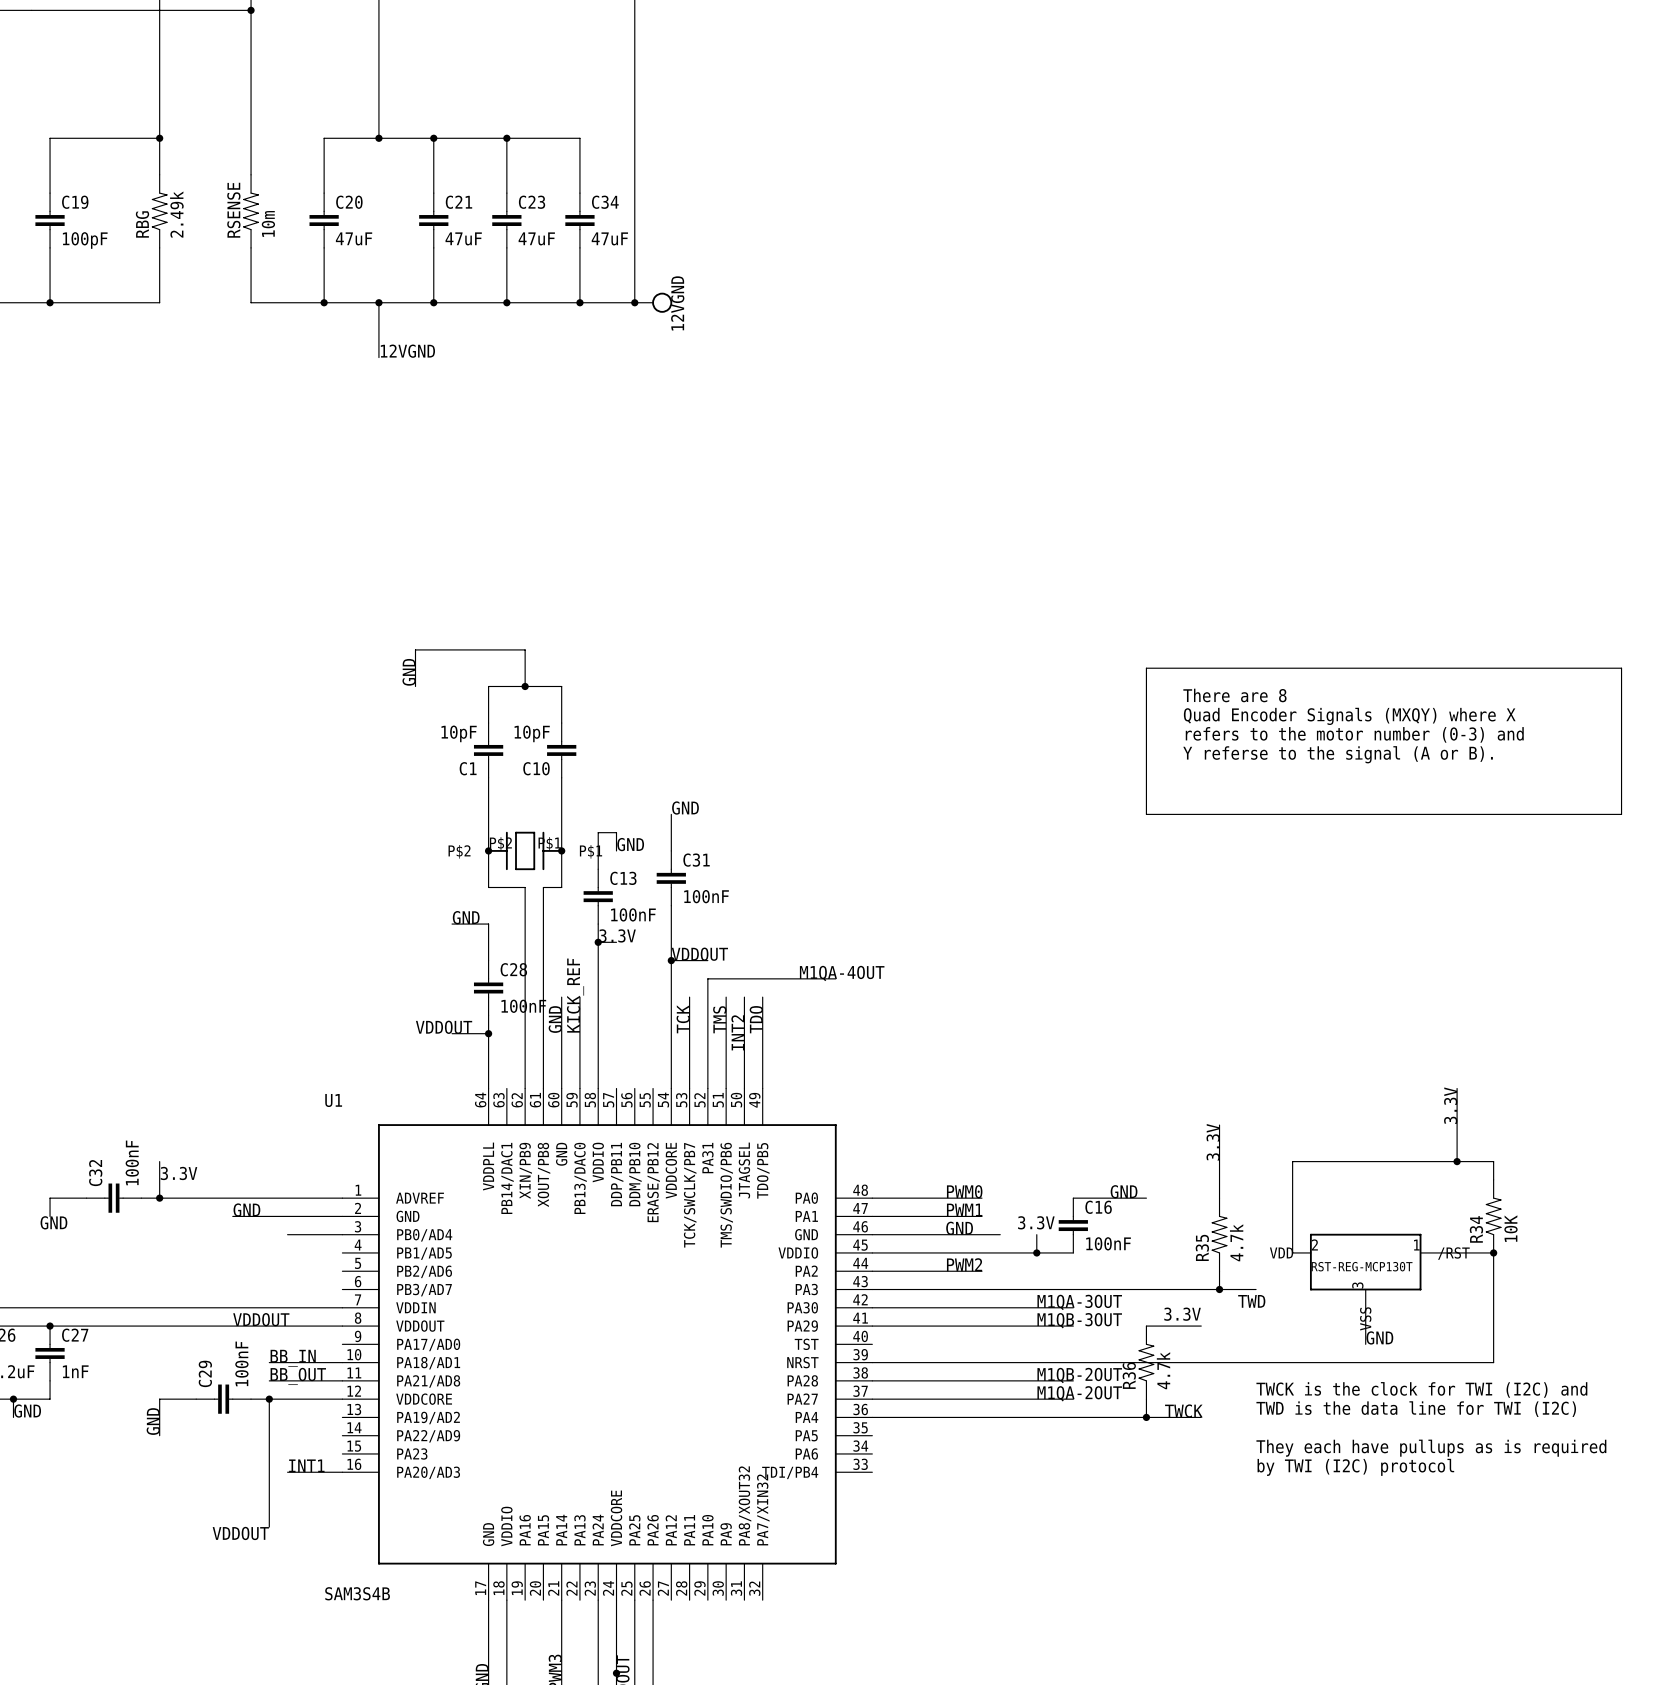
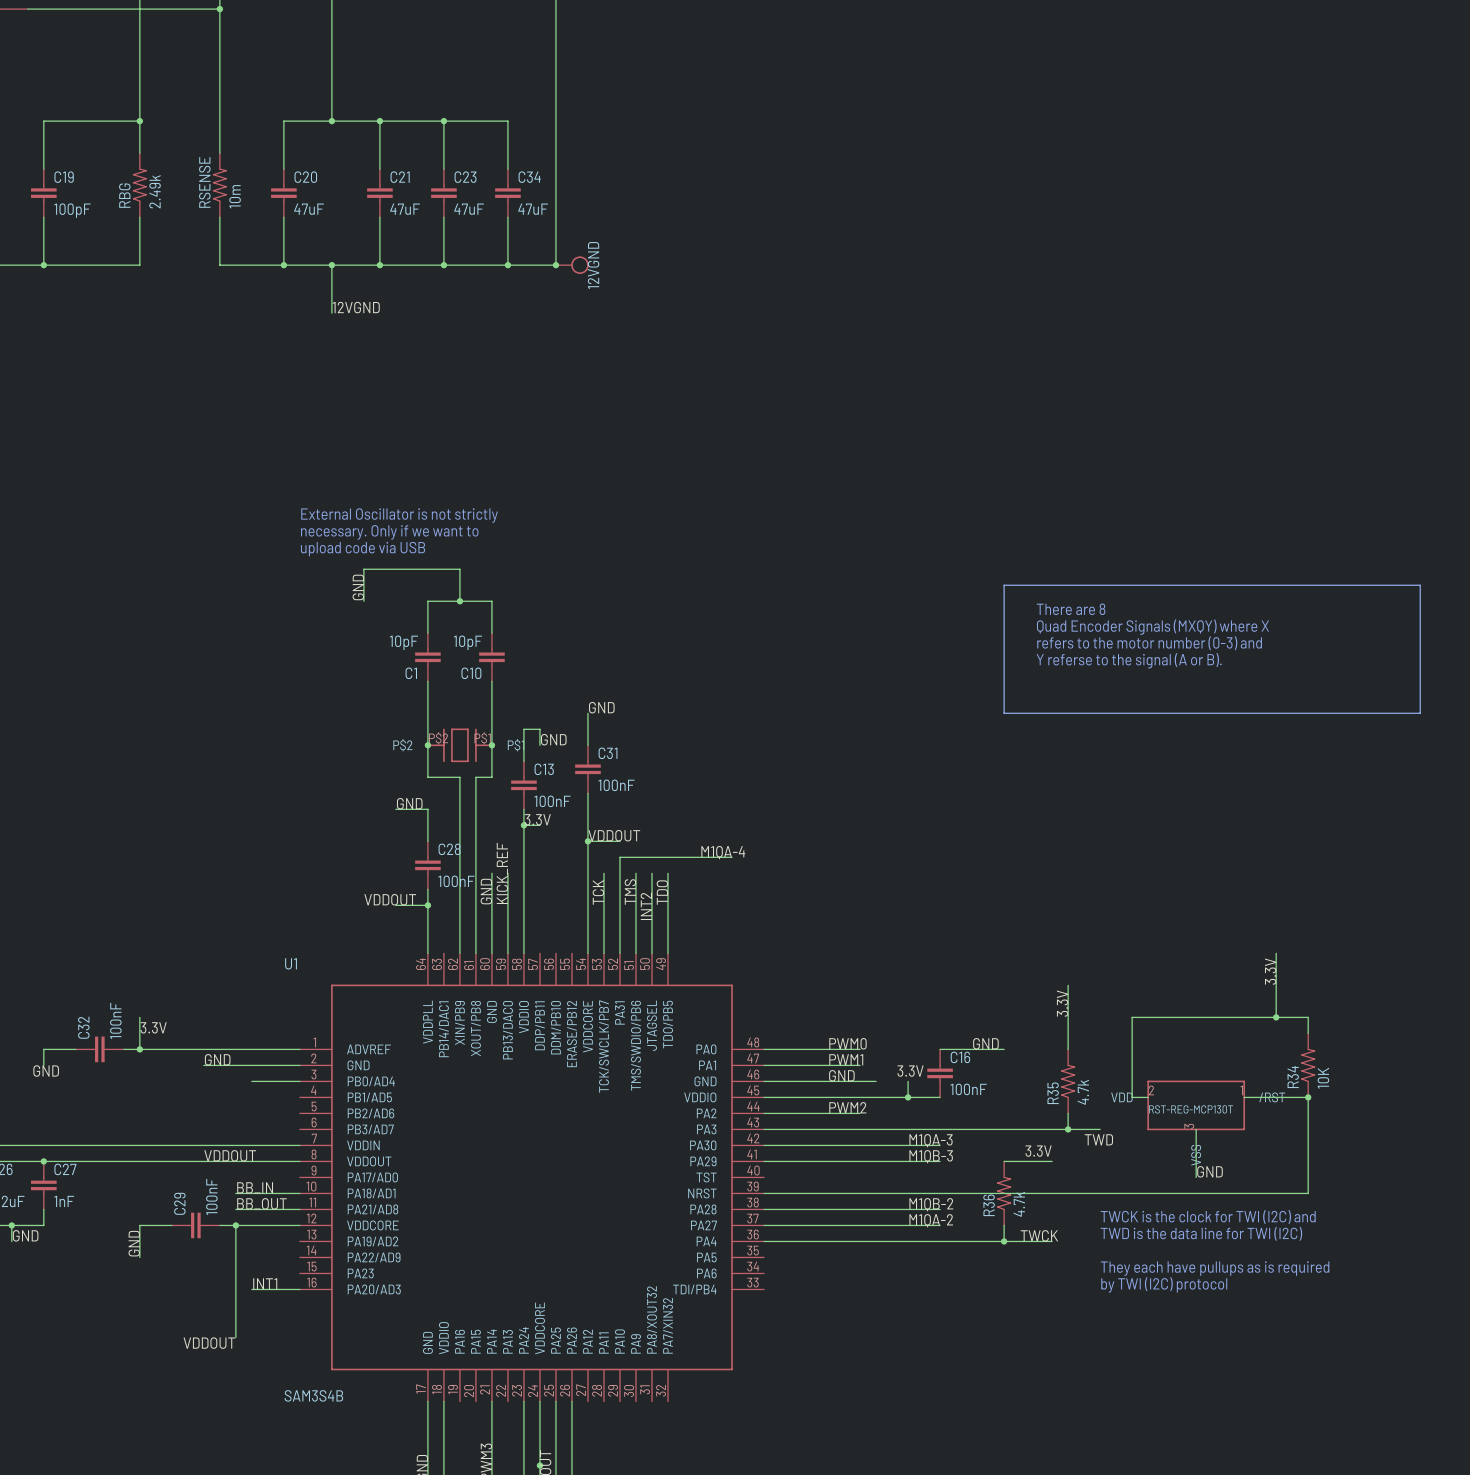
text: none -> External Oscillator is not strictly (399, 515)
text: none -> necessary. Only if we want to (389, 532)
text: none -> upload code via USB (363, 549)
label: M1QA-4OUT (842, 973) -> M1QA-4 (723, 852)
label: M1QA-3OUT (1079, 1302) -> M1QA-3 (931, 1140)
label: M1QB-3OUT (1079, 1320) -> M1QB-3 (931, 1156)
label: M1QB-2OUT (1079, 1375) -> M1QB-2 (931, 1204)
label: M1QA-2OUT (1079, 1393) -> M1QA-2 (931, 1220)

